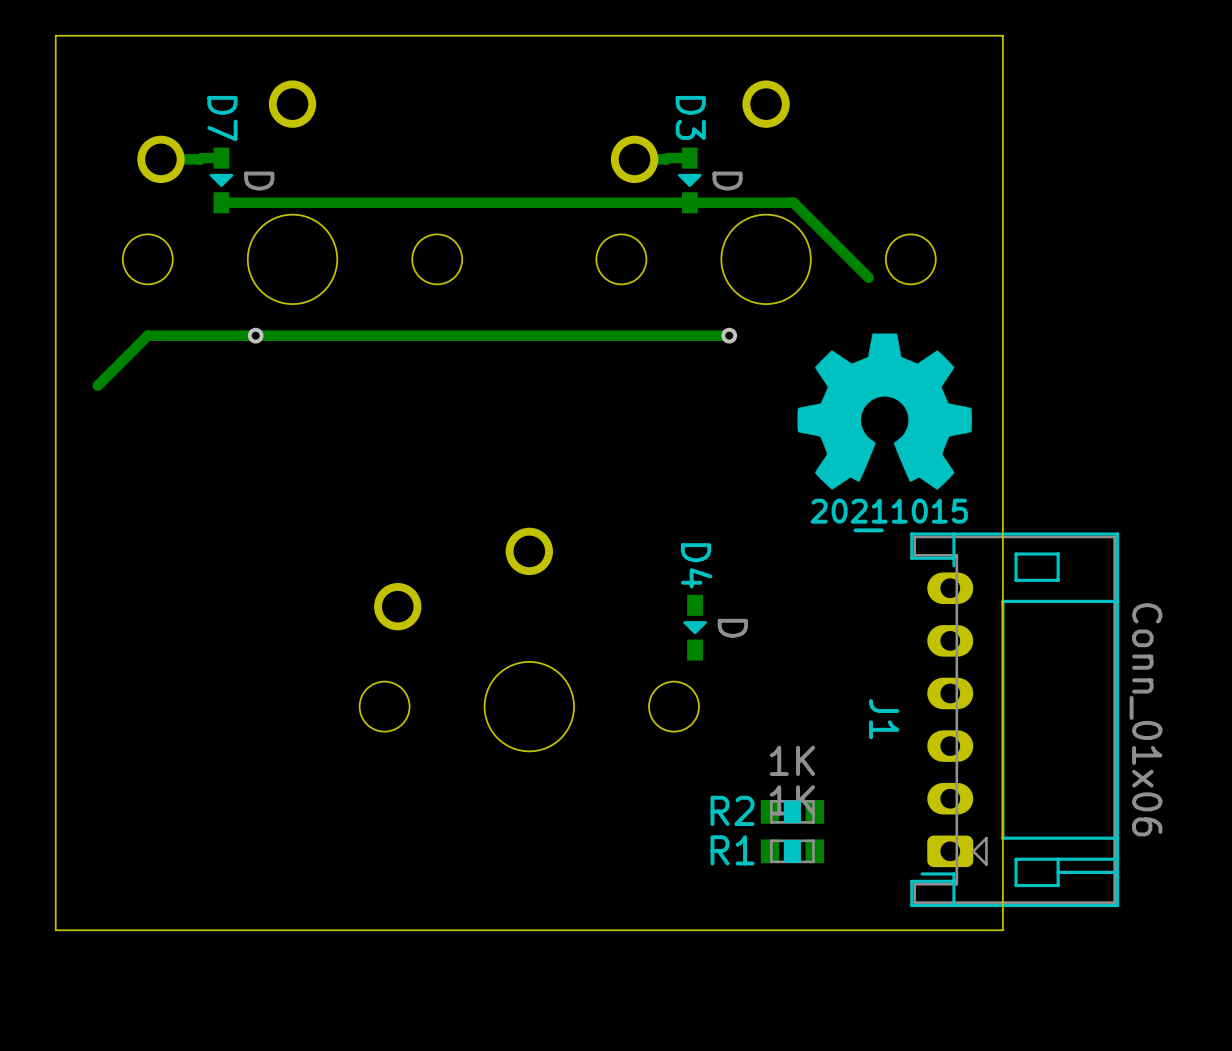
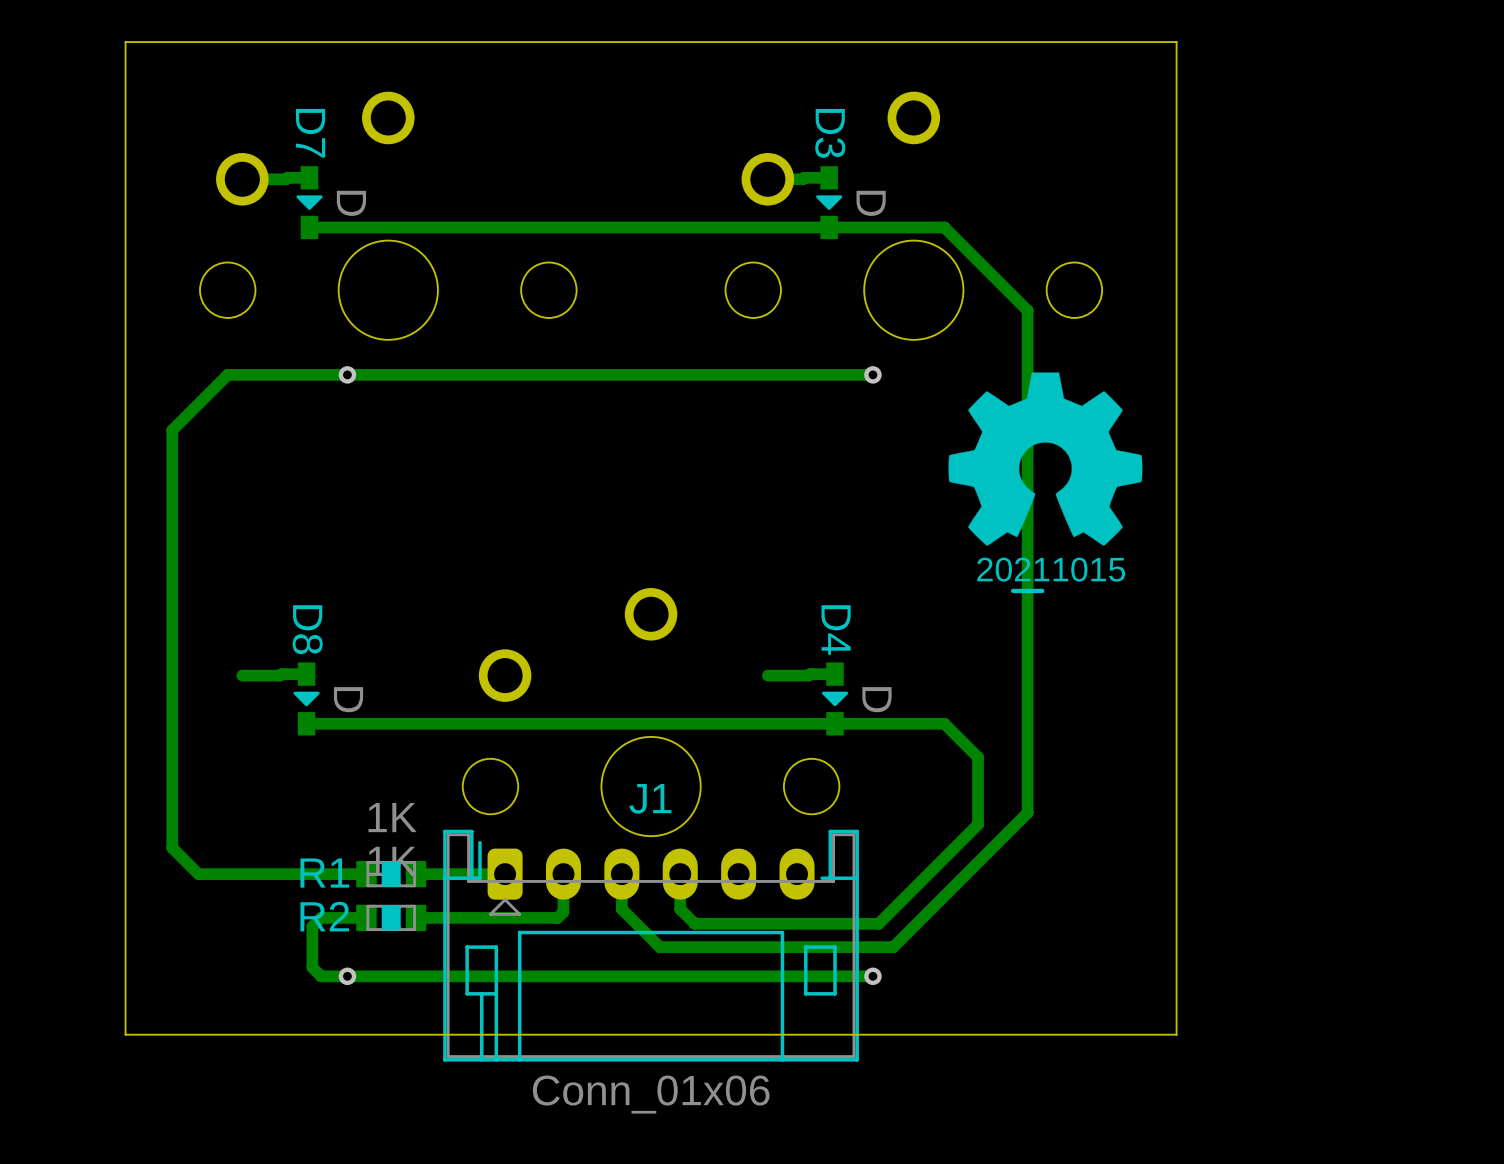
track: none -> (1027, 310) (1027, 812) (893, 947) (659, 947) (621, 909) (621, 874)
track: none -> (172, 430) (172, 847) (198, 874) (366, 874)
track: none -> (306, 674) (242, 675)
track: none -> (834, 674) (767, 675)
D8: none -> D (306, 698)
track: none -> (306, 723) (944, 723) (978, 757) (978, 824) (878, 923) (694, 923) (680, 909) (680, 874)
J1 rotation: 0° (1014, 719) -> 90° clockwise (651, 945)
J1 position: (1014, 719) -> (651, 945)
track: none -> (505, 874) (416, 874)
track: none -> (563, 874) (563, 912) (557, 917) (416, 917)
R2 position: (792, 811) -> (391, 917)
track: none -> (366, 917) (321, 917) (312, 926) (312, 967) (321, 976) (872, 976)
R1 position: (792, 851) -> (391, 874)
via: none -> (347, 976)
via: none -> (872, 976)

